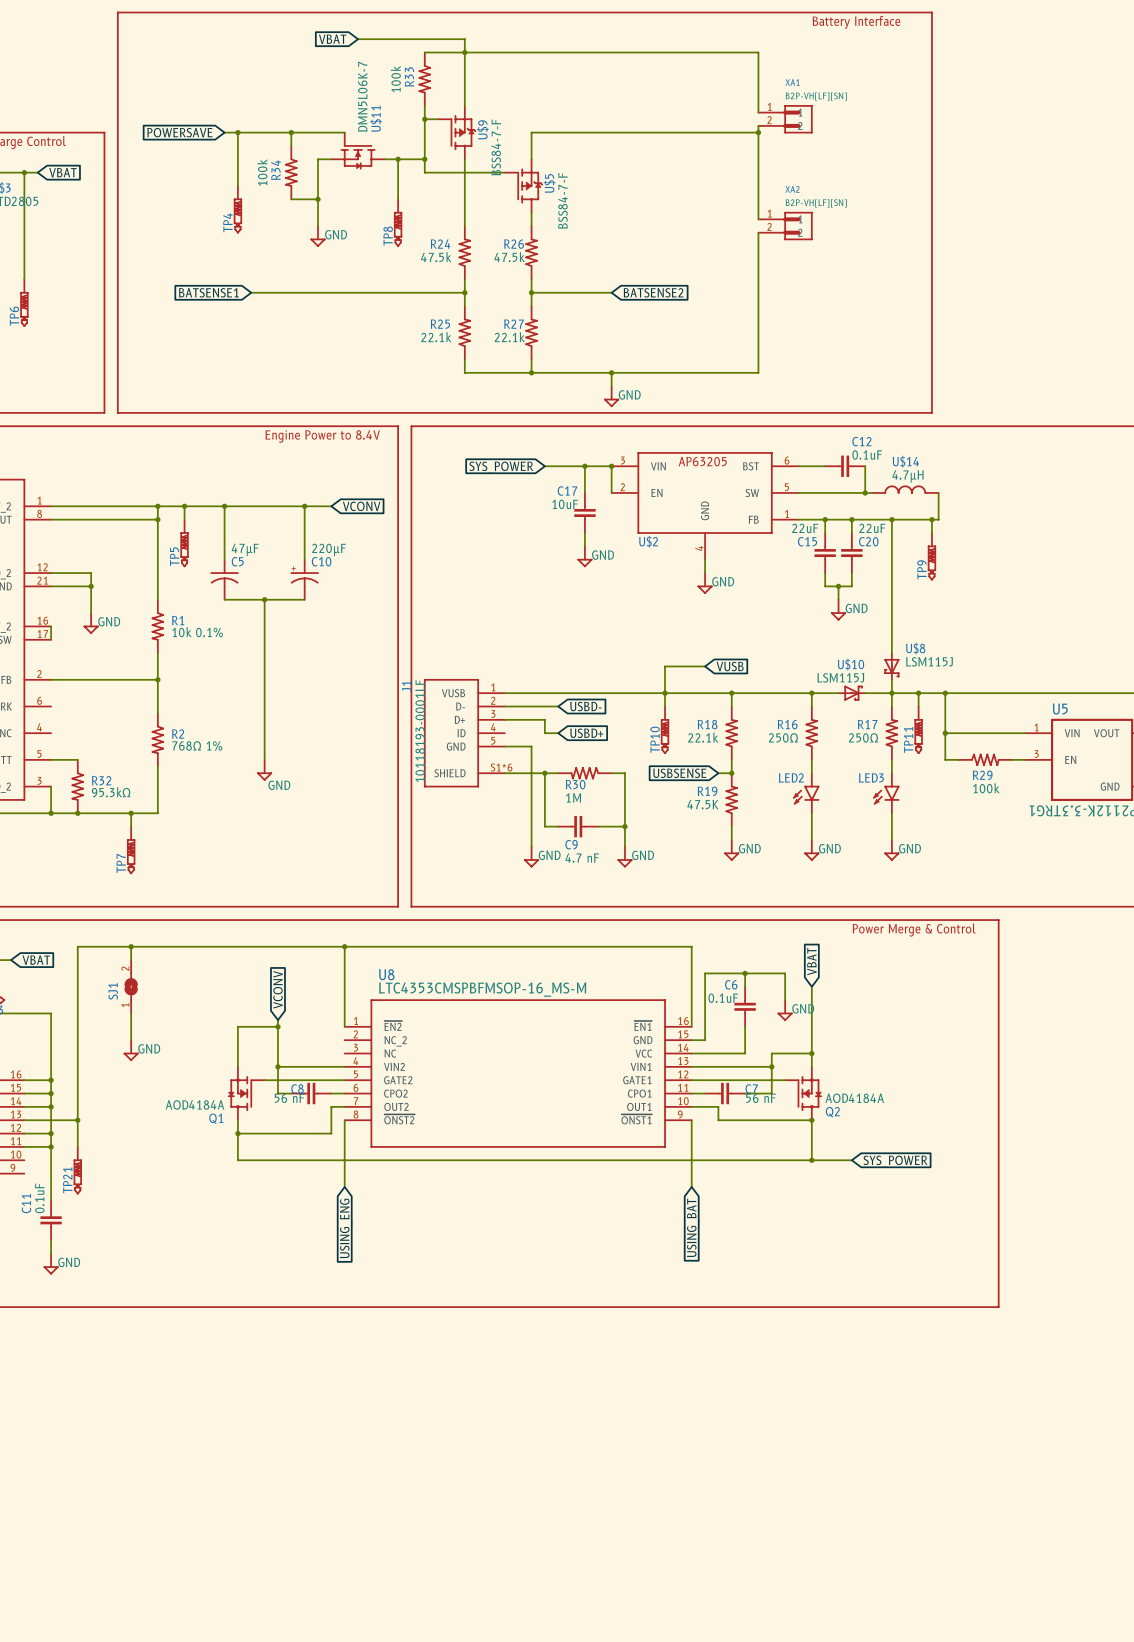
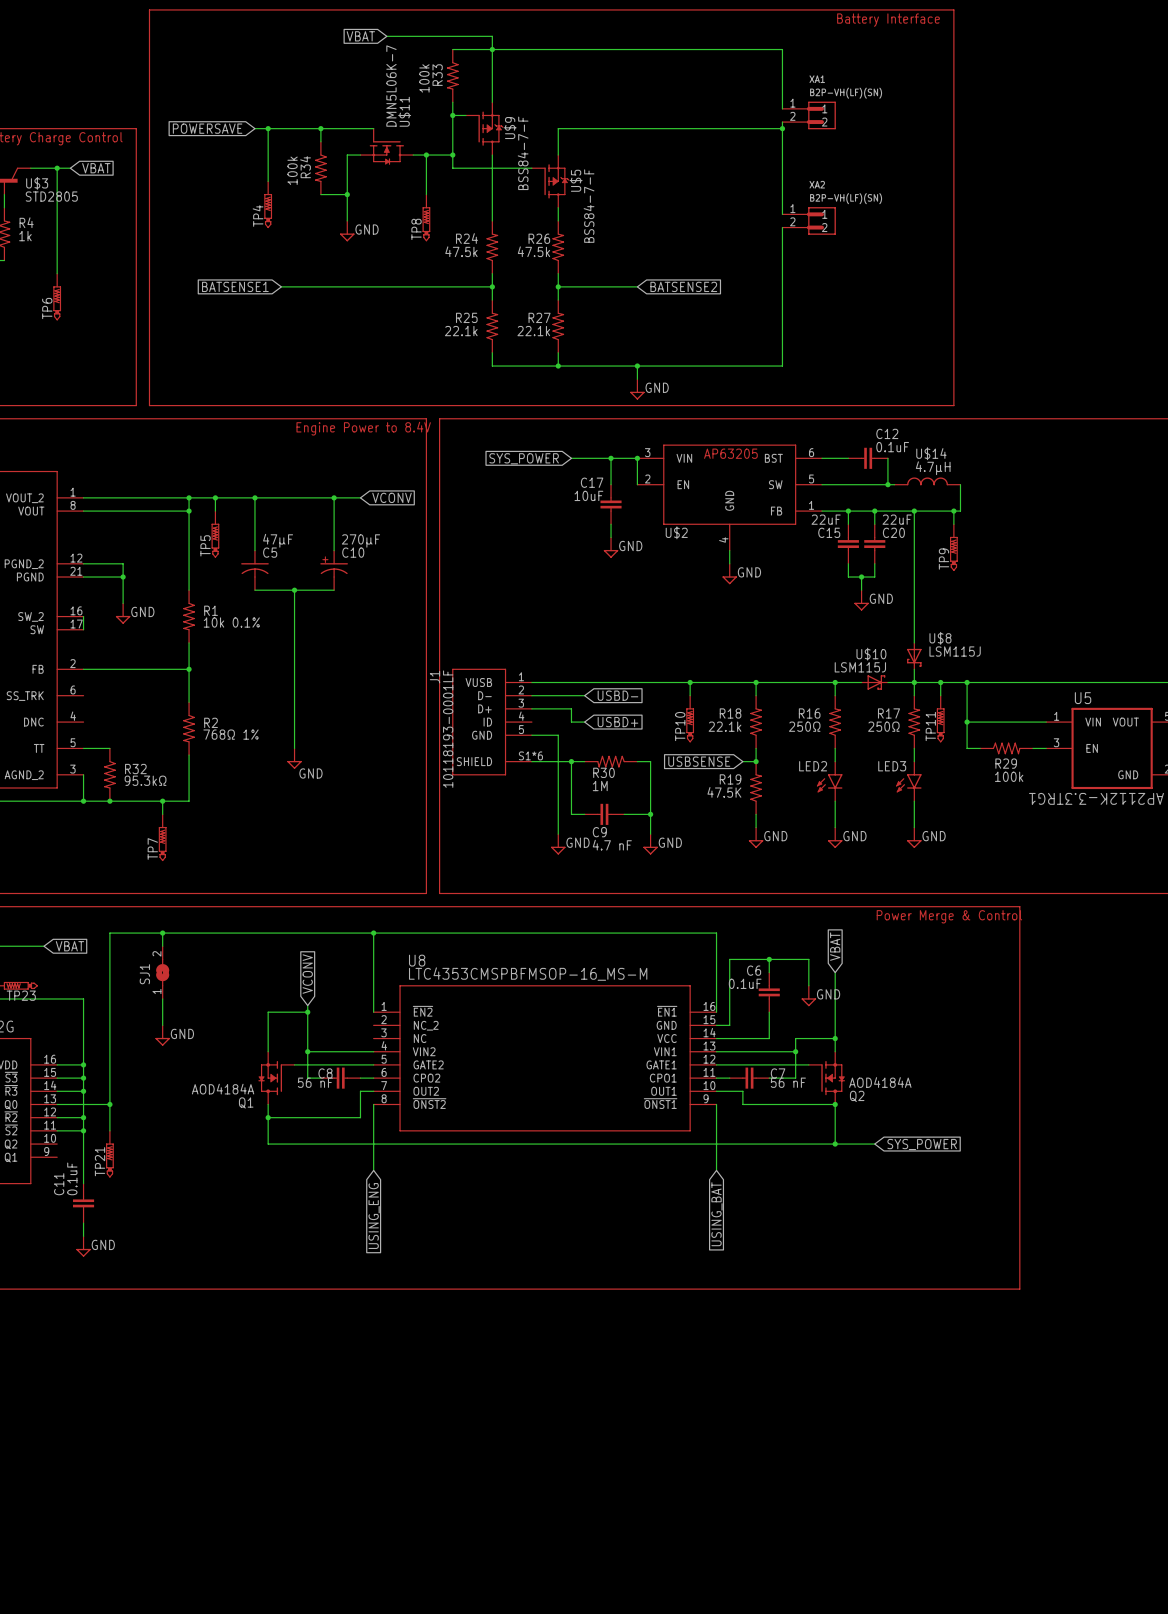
C10 value: 220µF (329, 549) -> 270µF (360, 540)
wire: (705, 666) (665, 666) (665, 693) -> none
global label: VUSB (730, 666) -> none

